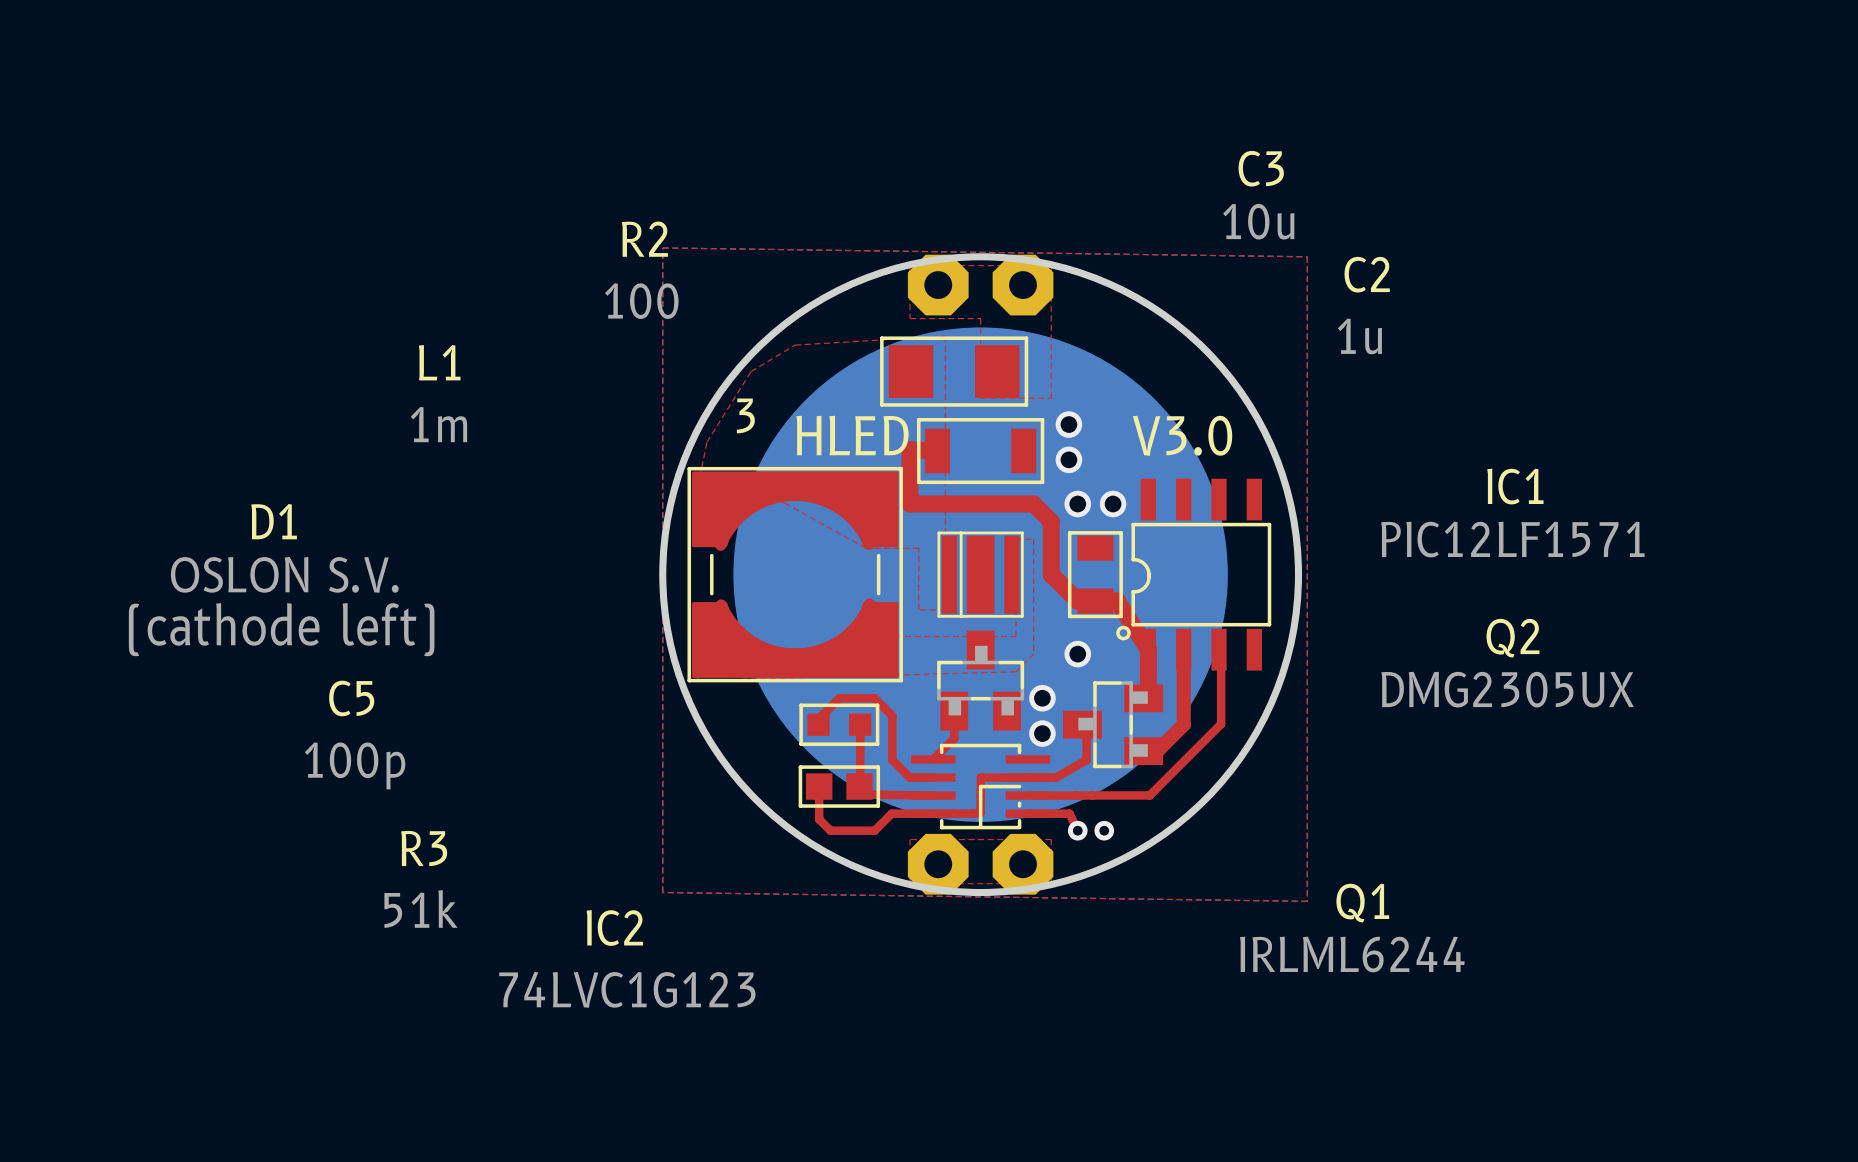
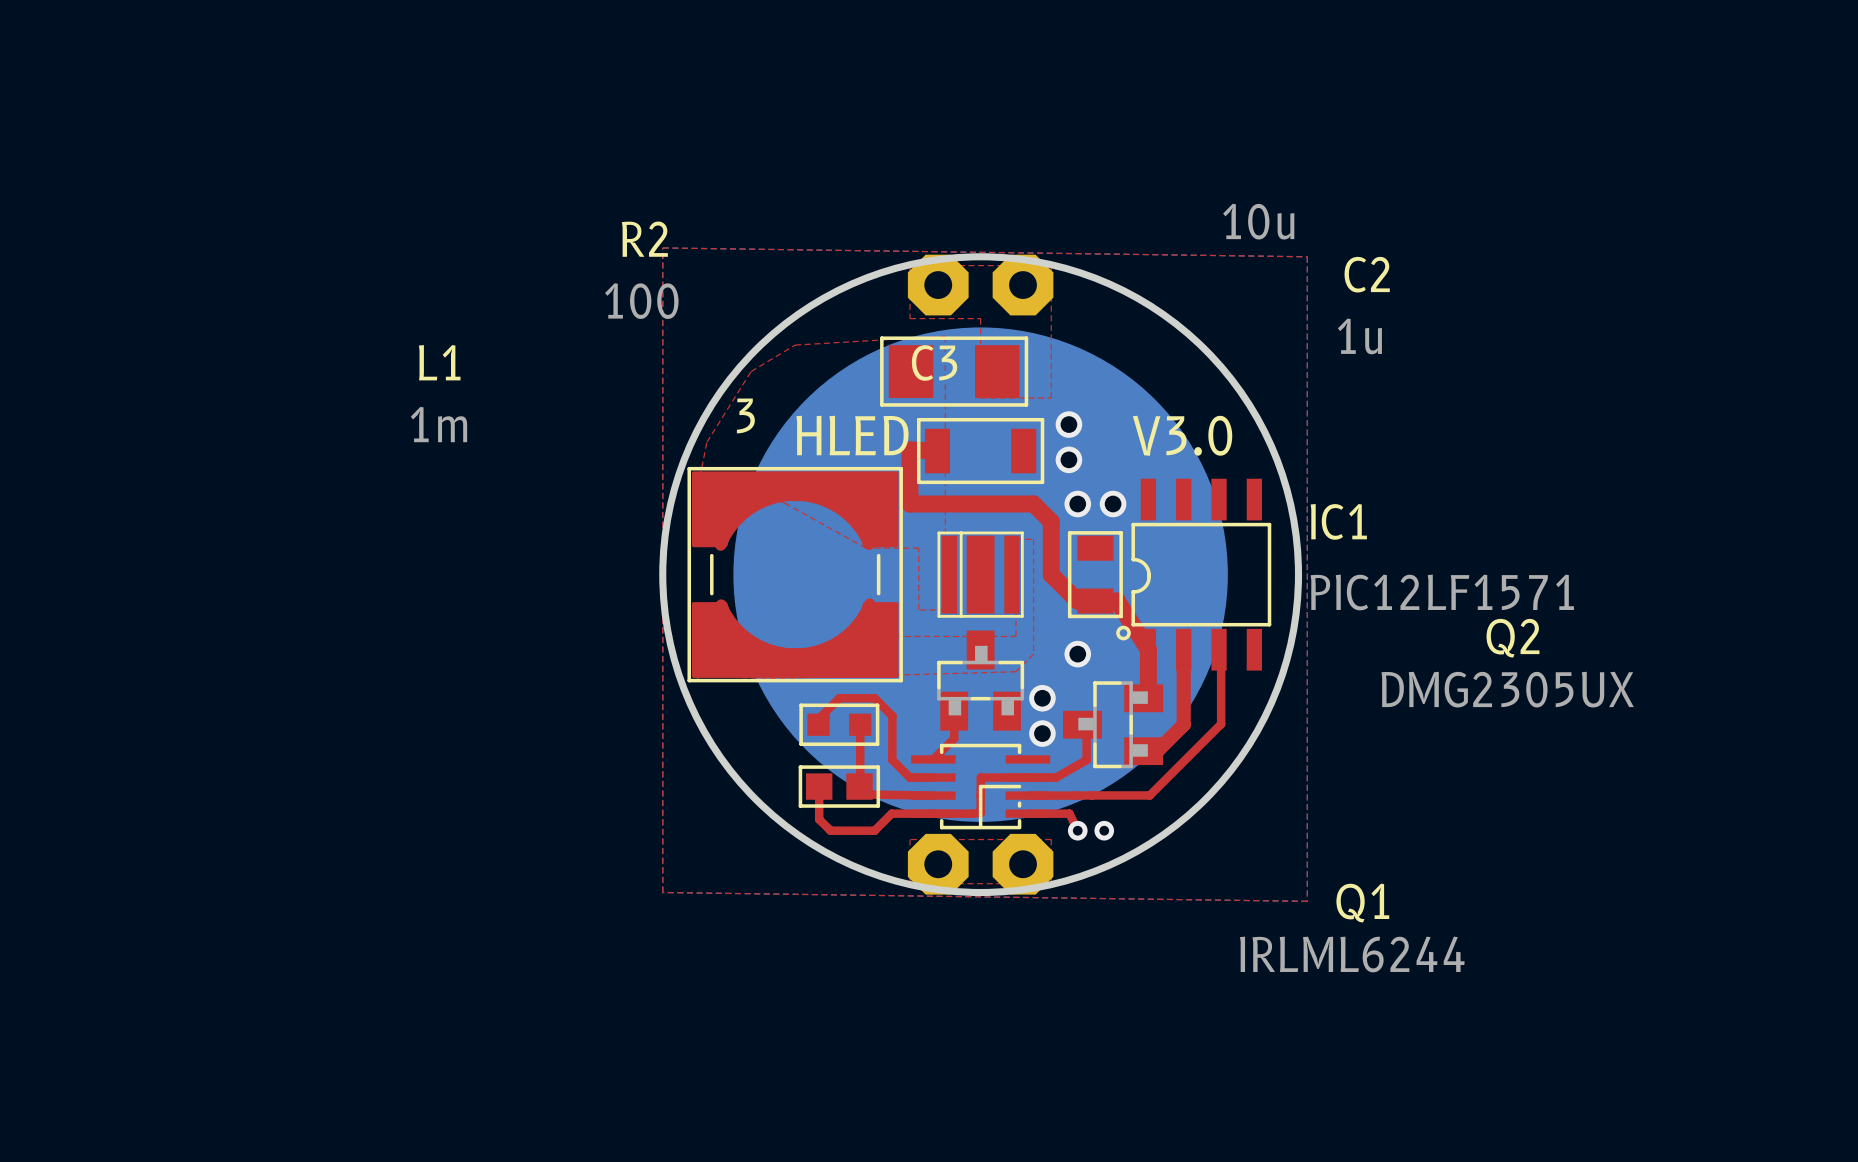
C3 name position: C3 (1261, 168) -> C3 (934, 362)
IC1 name position: IC1 (1515, 486) -> IC1 (1338, 521)
D1 name: D1 (274, 521) -> none
IC1 value position: PIC12LF1571 (1512, 539) -> PIC12LF1571 (1442, 592)
D1 value: OSLON S.V. (284, 574) -> none
text: (cathode left) (281, 629) -> none
C5 name: C5 (351, 698) -> none
C5 value: 100p (355, 765) -> none
R3 name: R3 (424, 848) -> none
R3 value: 51k (421, 909) -> none
IC2 name: IC2 (614, 928) -> none
IC2 value: 74LVC1G123 (627, 989) -> none

